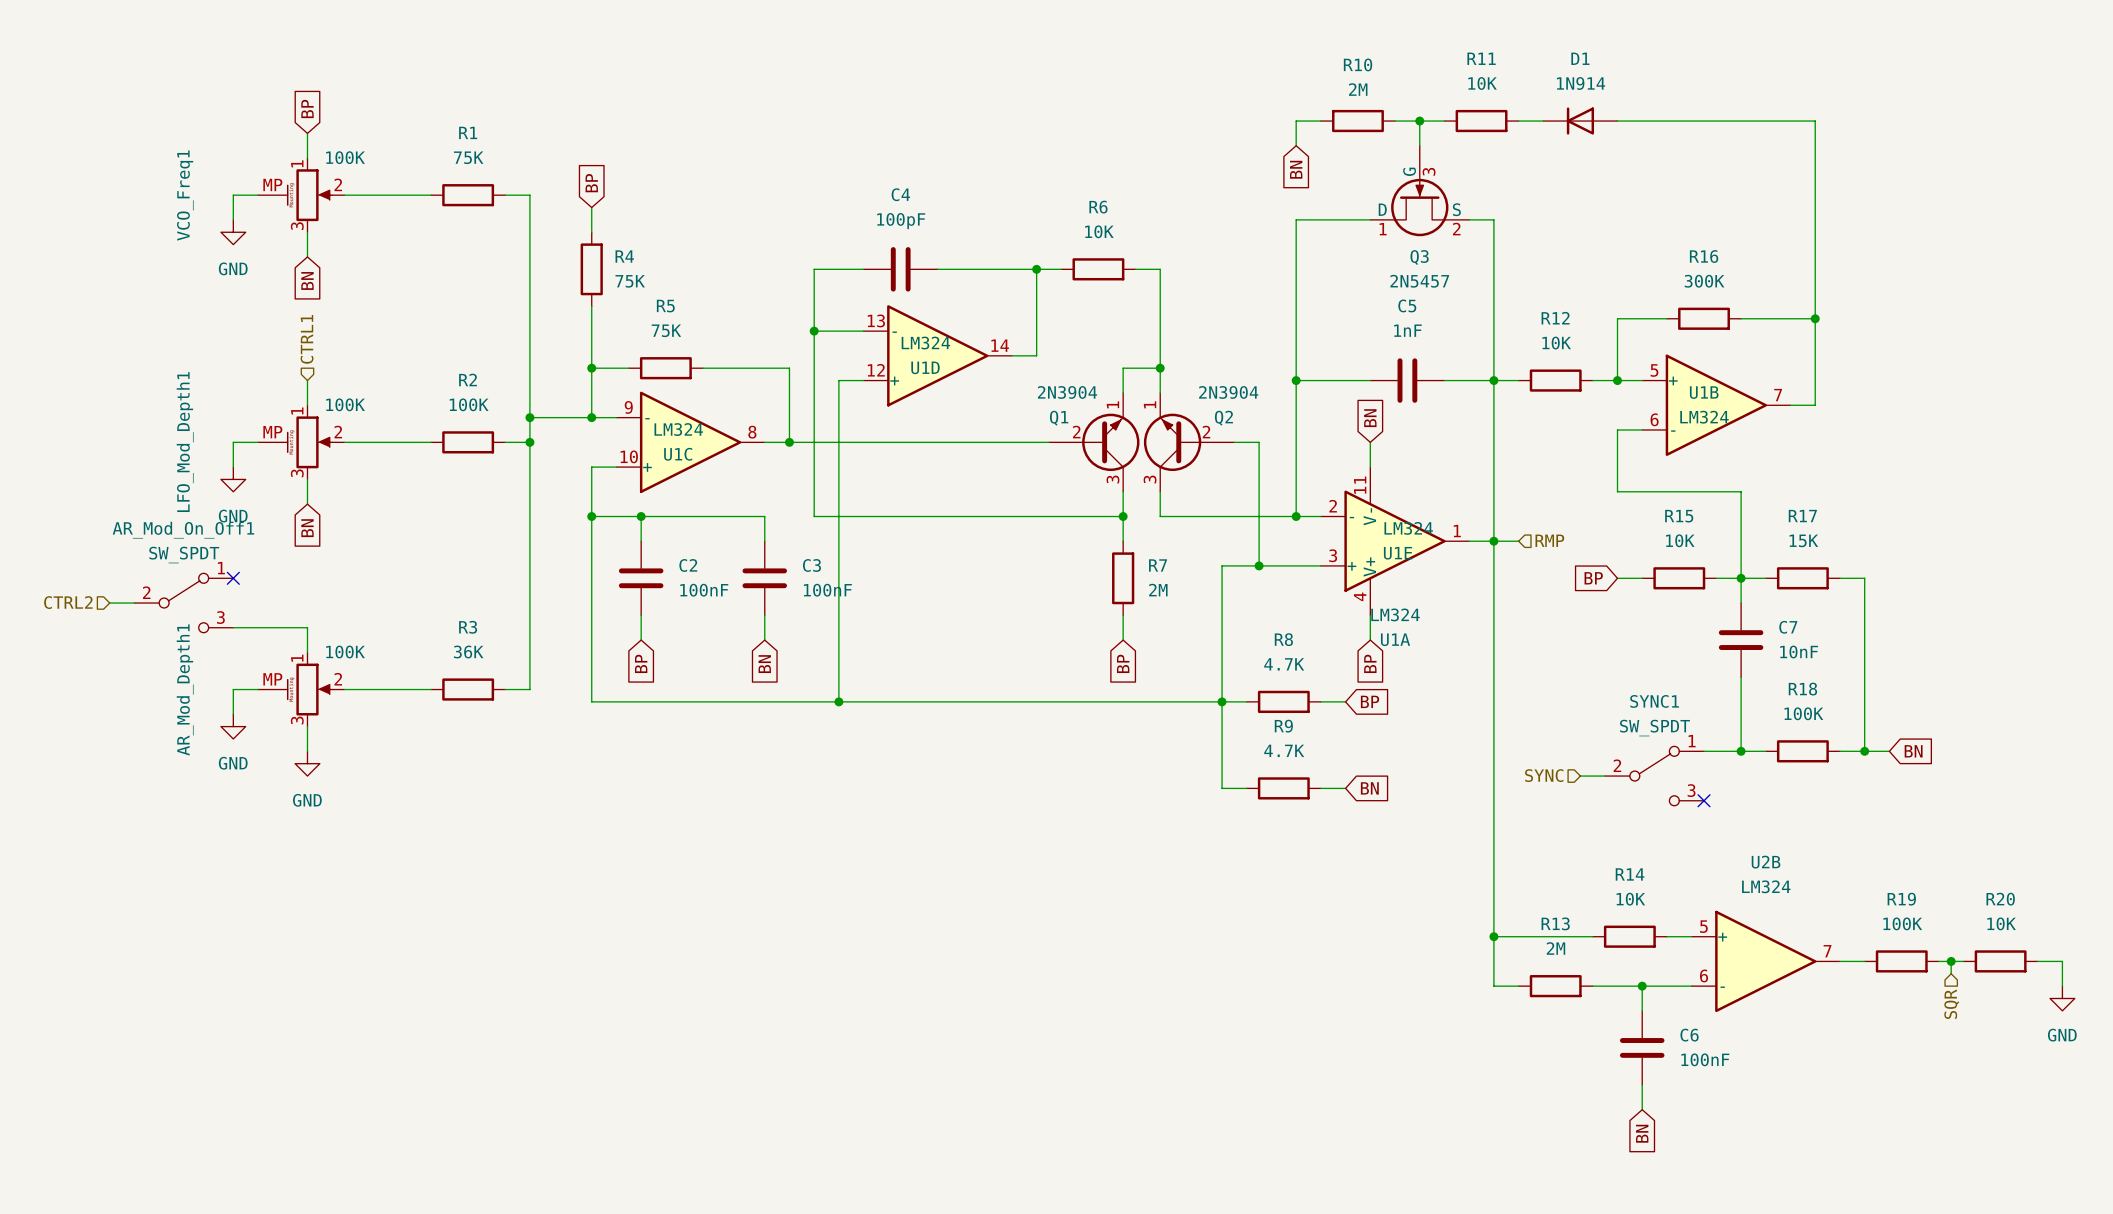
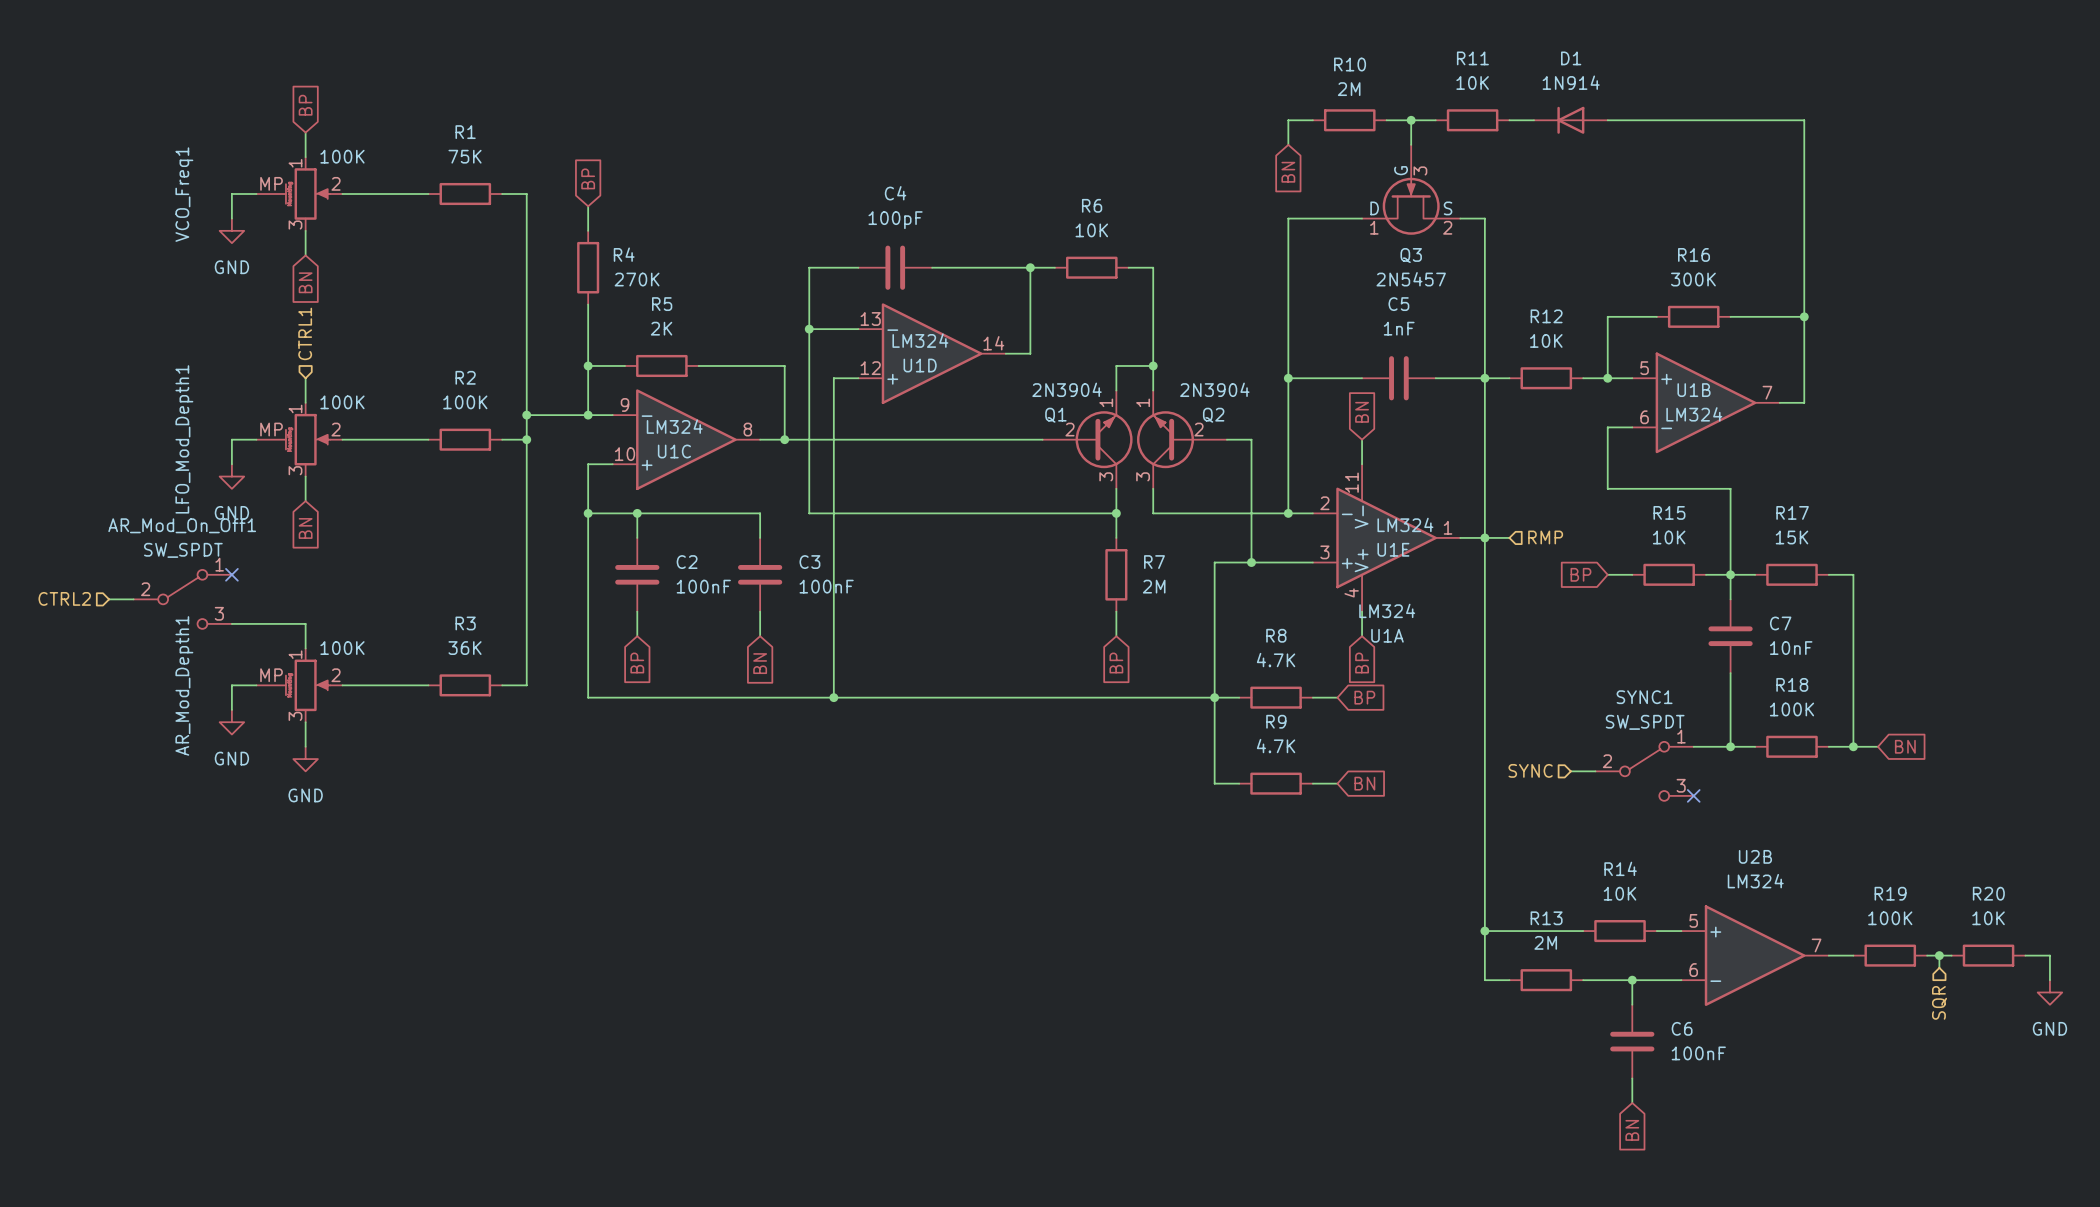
R4 value: 75K (630, 281) -> 270K (637, 279)
R5 value: 75K (666, 330) -> 2K (661, 328)

